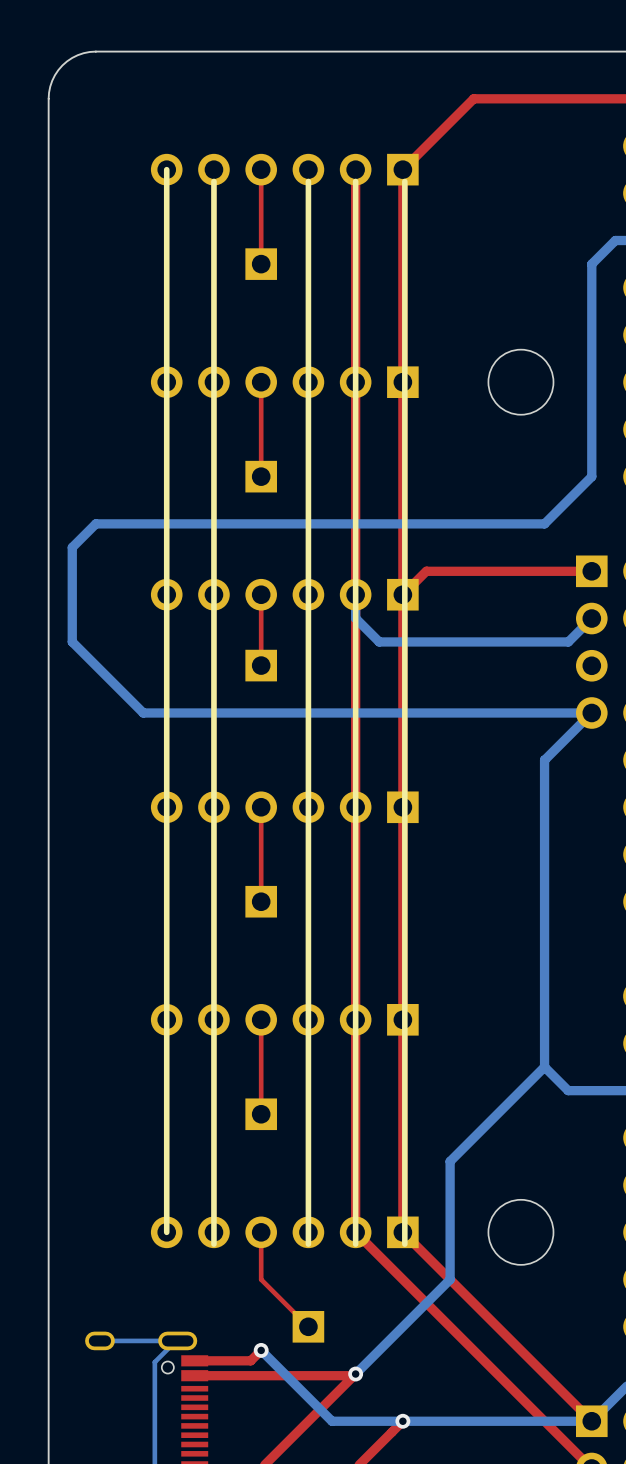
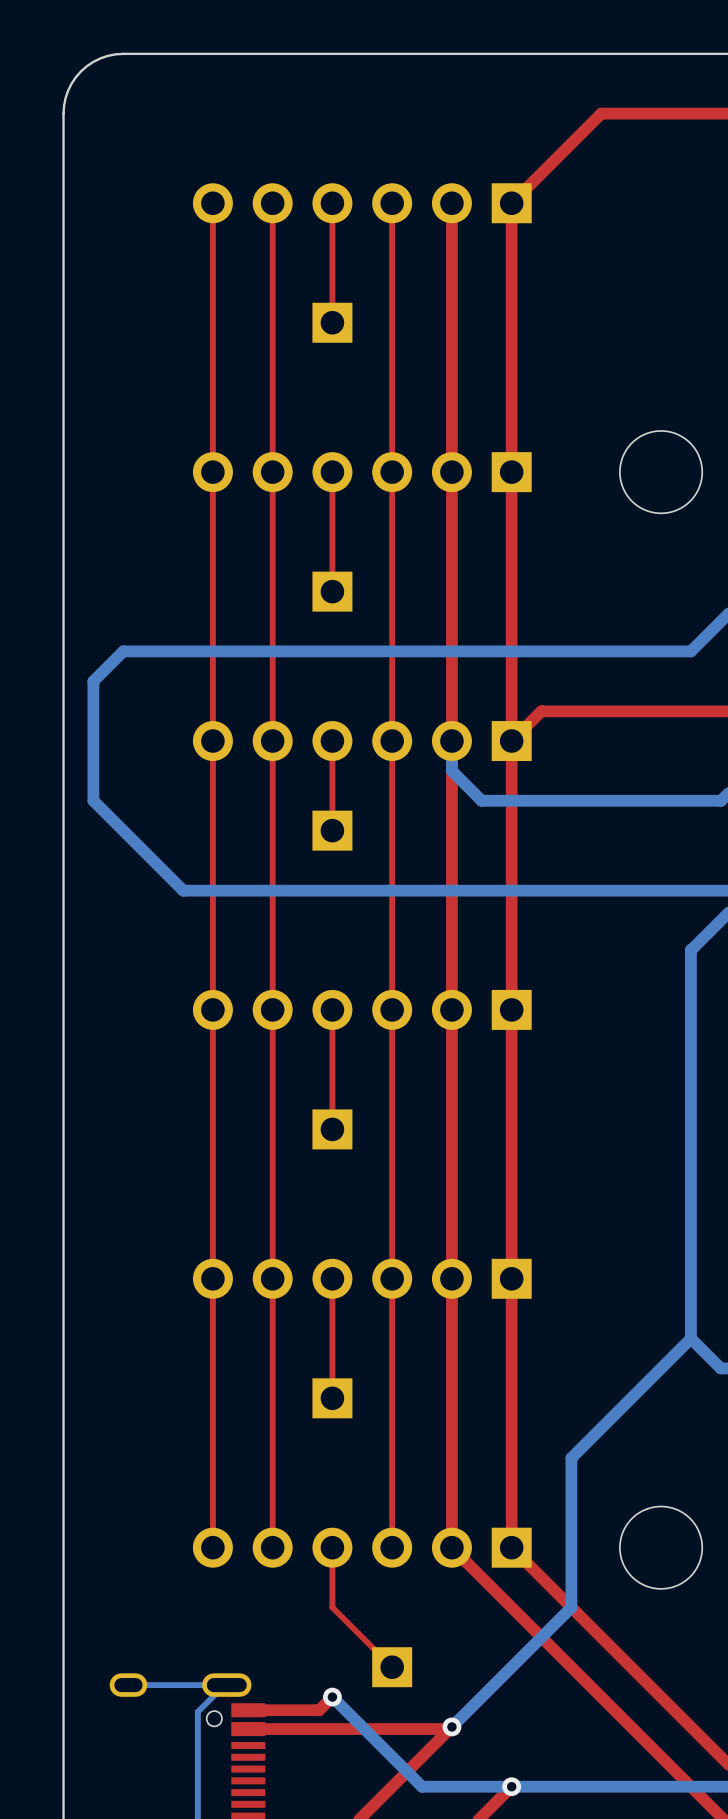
line: (166, 169) (166, 1232) -> none
line: (213, 181) (213, 1244) -> none
line: (308, 181) (308, 1244) -> none
line: (355, 181) (355, 1244) -> none
line: (404, 181) (404, 1244) -> none

